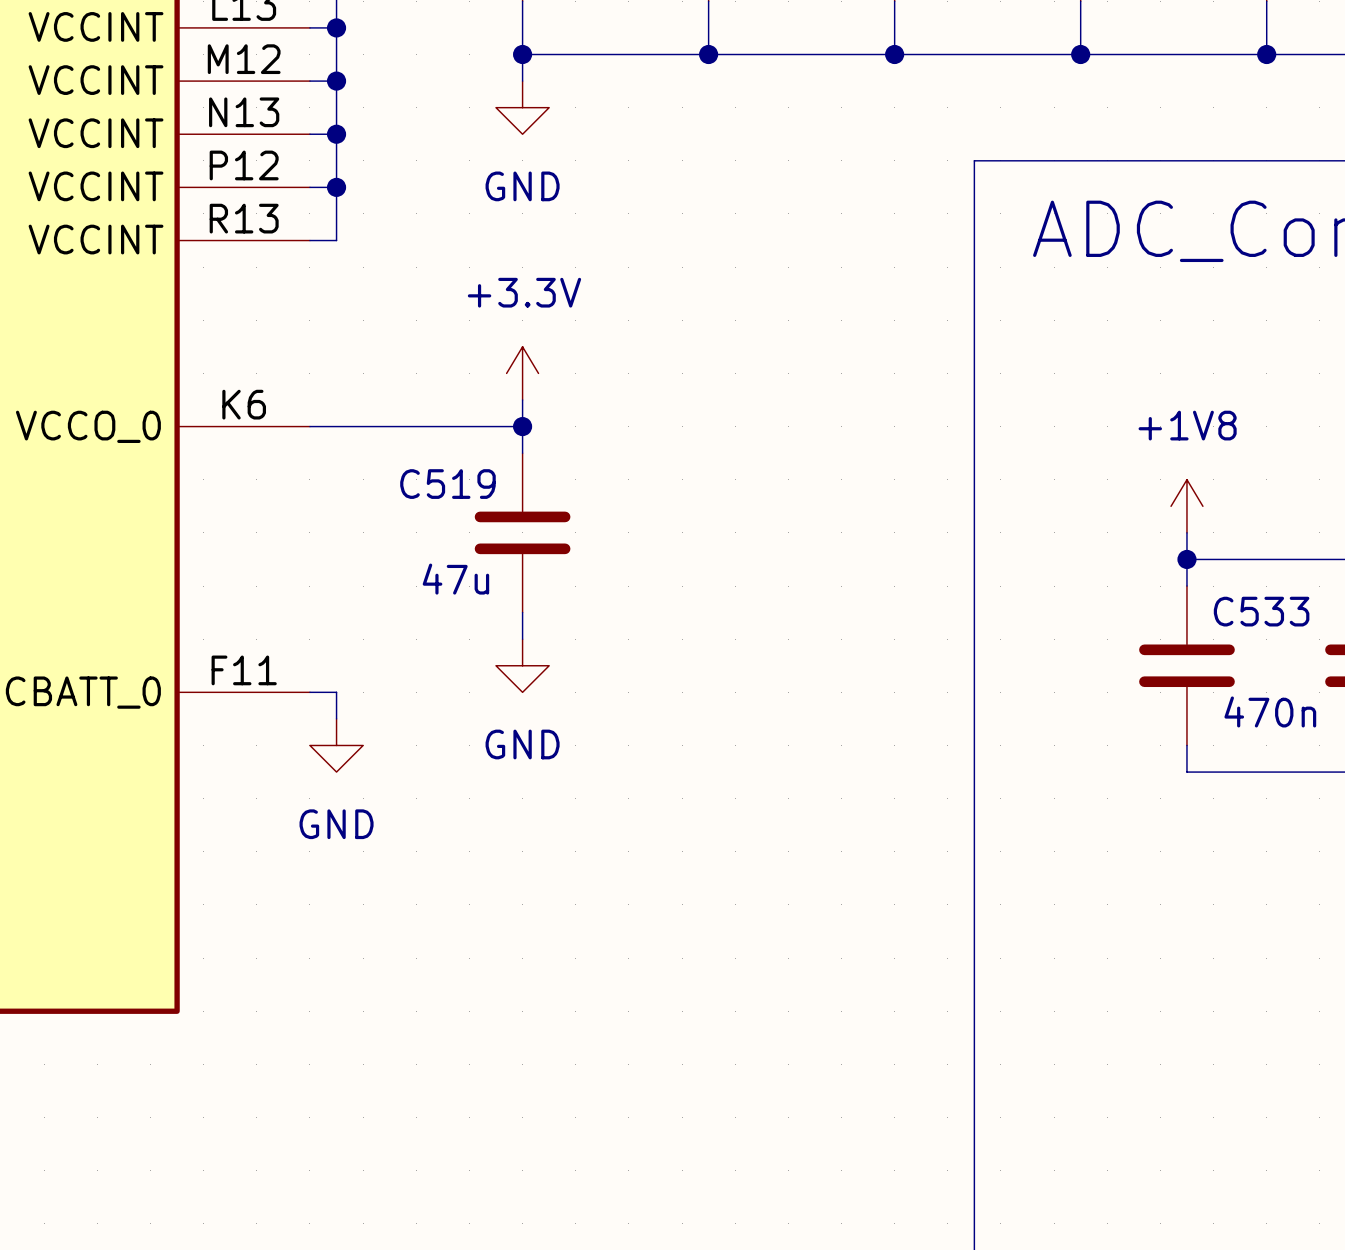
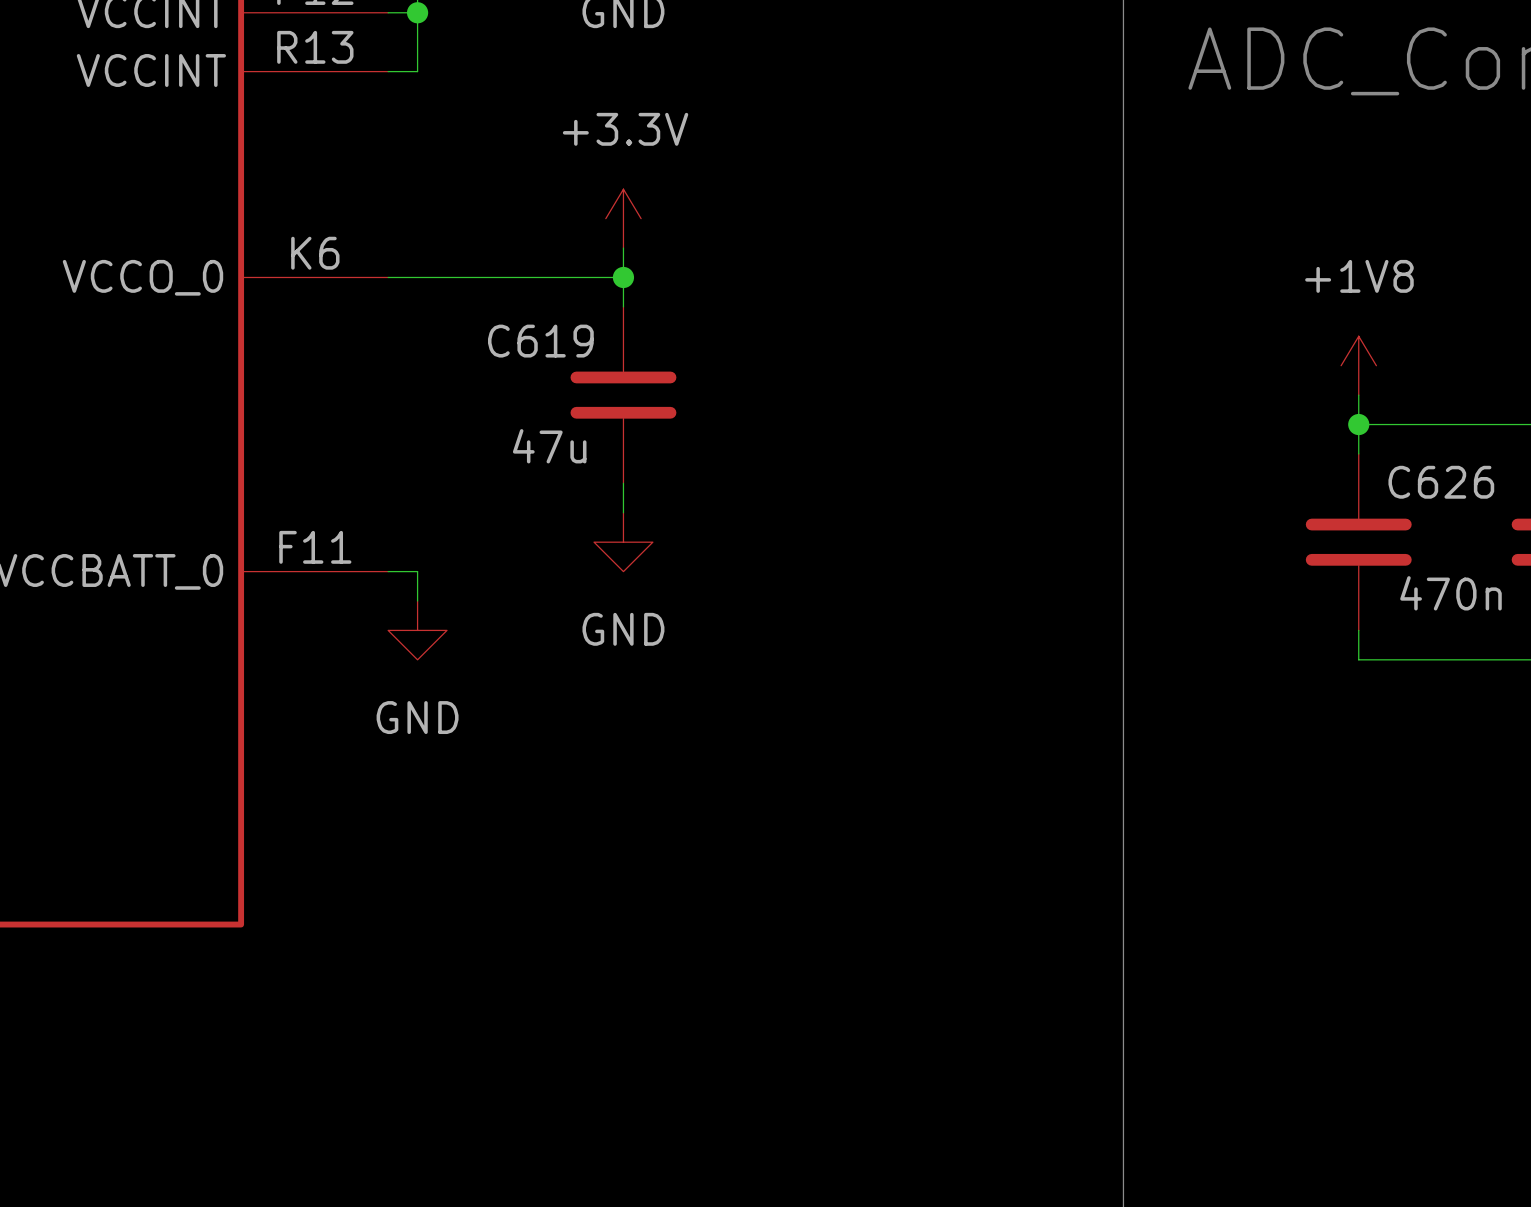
C519 name: C519 (447, 484) -> C619 (540, 341)
C533 name: C533 (1261, 611) -> C626 (1441, 482)

